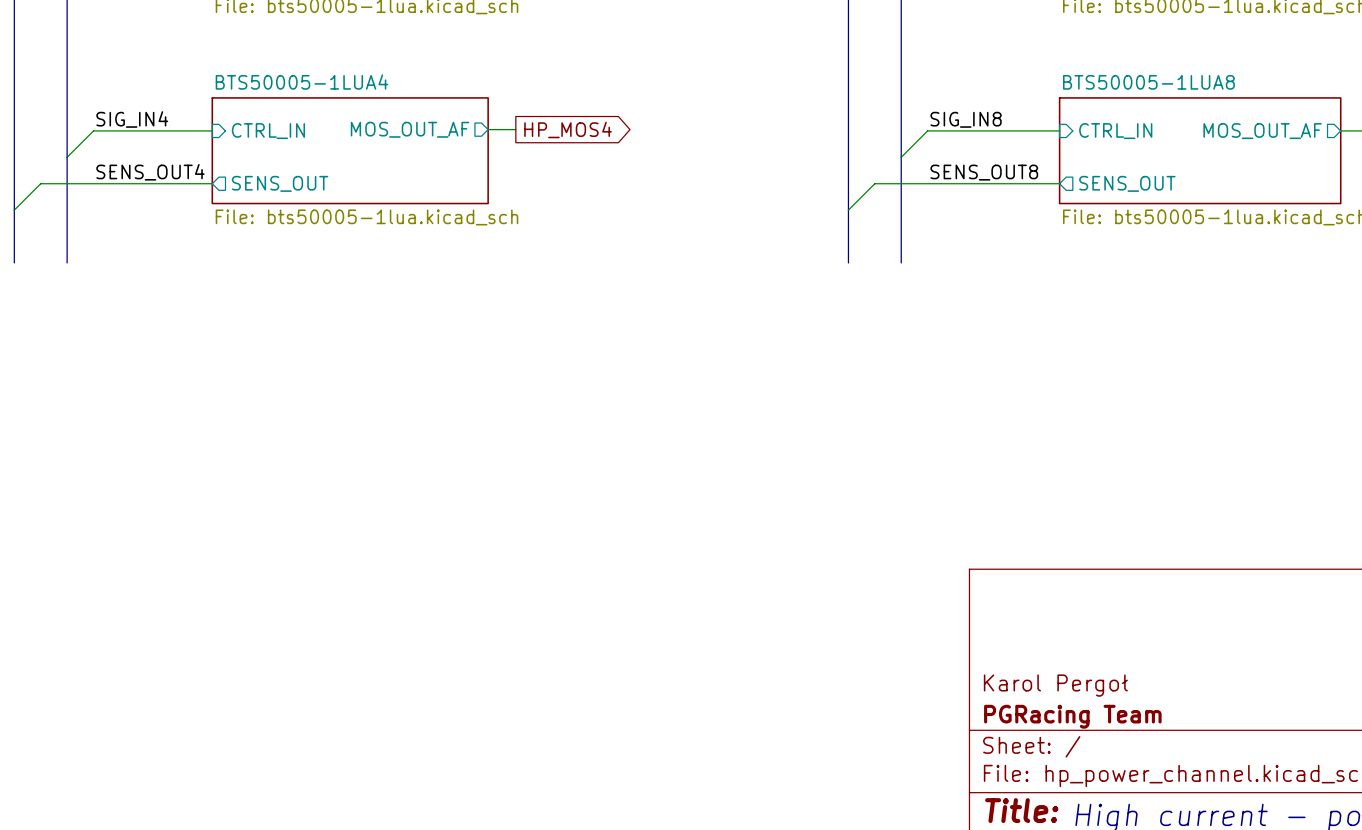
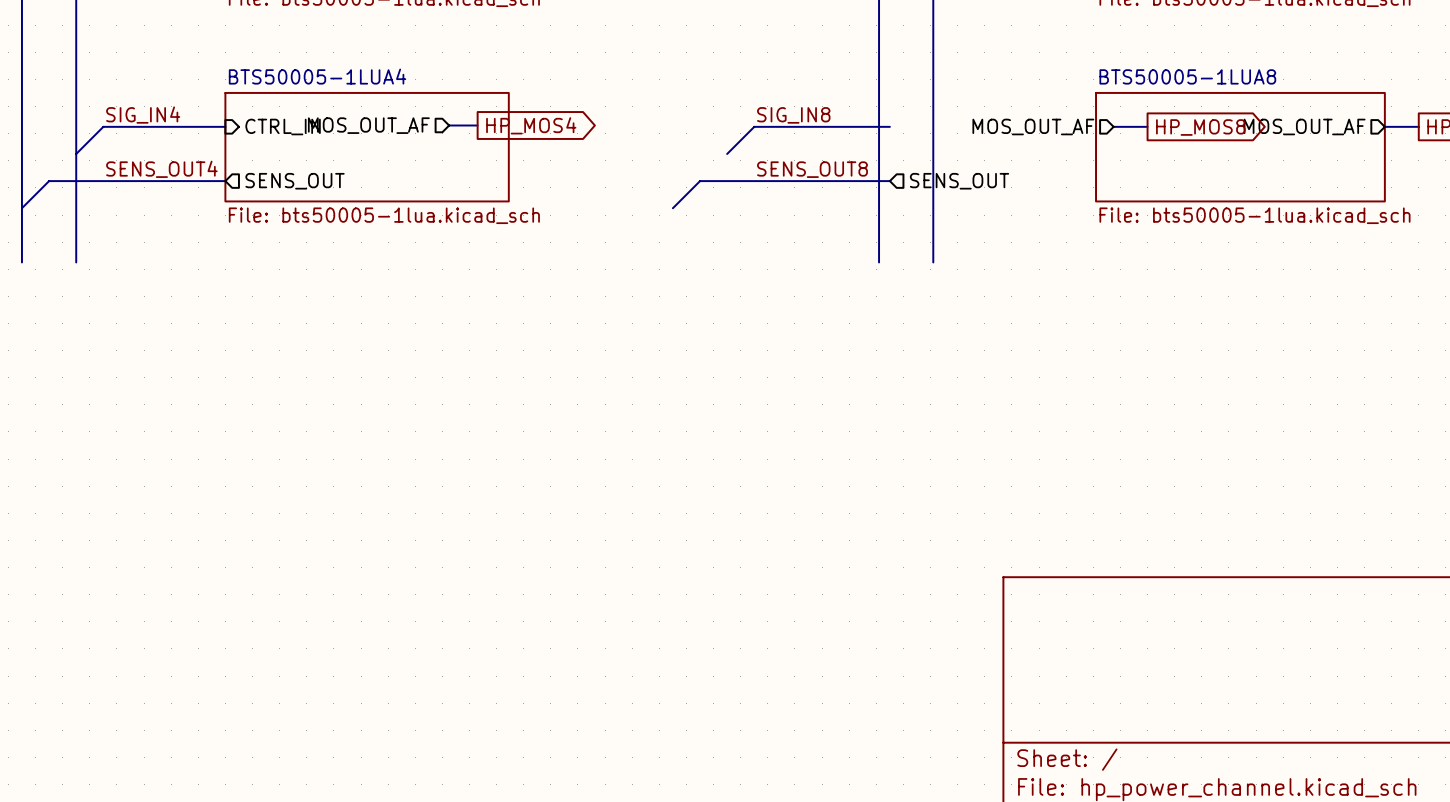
label position: SIG_IN8 (966, 119) -> SIG_IN8 (793, 115)
sheet pin position: MOS_OUT_AF (410, 129) -> MOS_OUT_AF (368, 125)
wire: (488, 129) (515, 129) -> (449, 125) (477, 125)
global label position: HP_MOS4 (568, 129) -> HP_MOS4 (531, 125)
wire: (927, 130) (901, 157) -> (754, 126) (727, 153)
wire: (927, 130) (1059, 130) -> (754, 126) (889, 126)
wire: none -> (1113, 126) (1147, 126)
sheet pin: none -> MOS_OUT_AF (1033, 126)
sheet pin: CTRL_IN (1115, 131) -> none
global label: none -> HP_MOS8 (1200, 127)
label position: SENS_OUT8 (984, 172) -> SENS_OUT8 (812, 169)
sheet pin: none -> SENS_OUT (959, 181)
wire: (1059, 183) (874, 183) (848, 210) -> (889, 181) (700, 181) (672, 208)
sheet pin: SENS_OUT (1127, 183) -> none
title block: Karol Pergoł (1055, 685) -> none
title block: PGRacing Team (1072, 716) -> none

